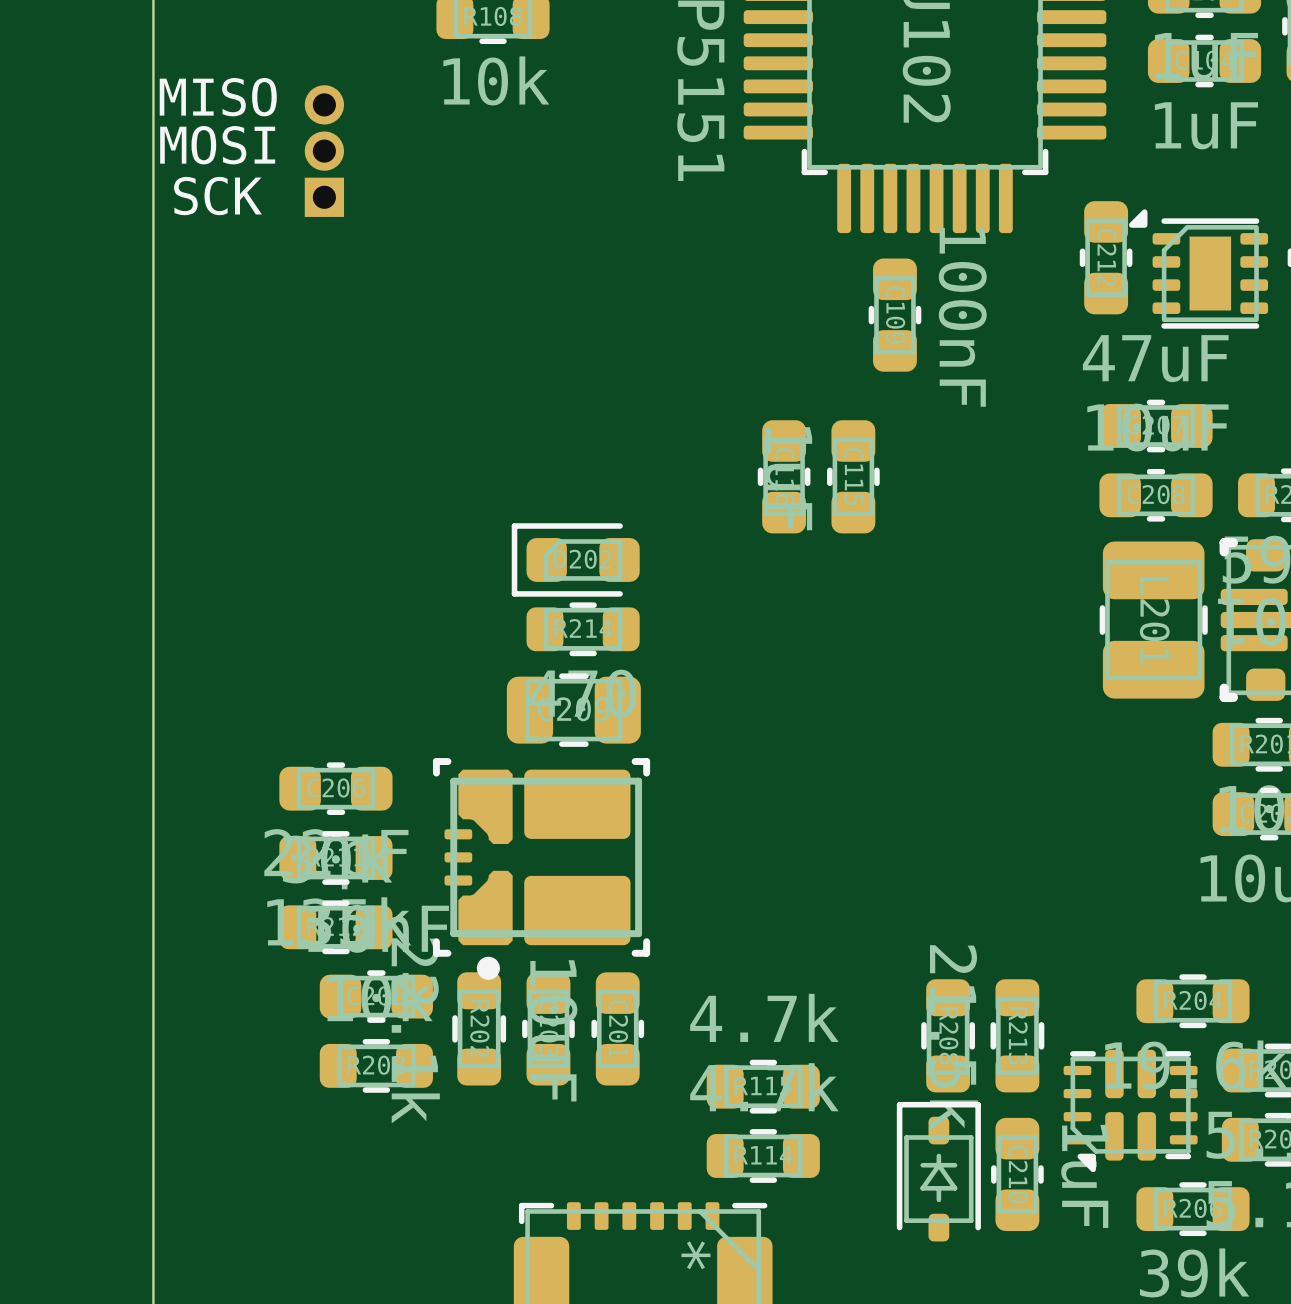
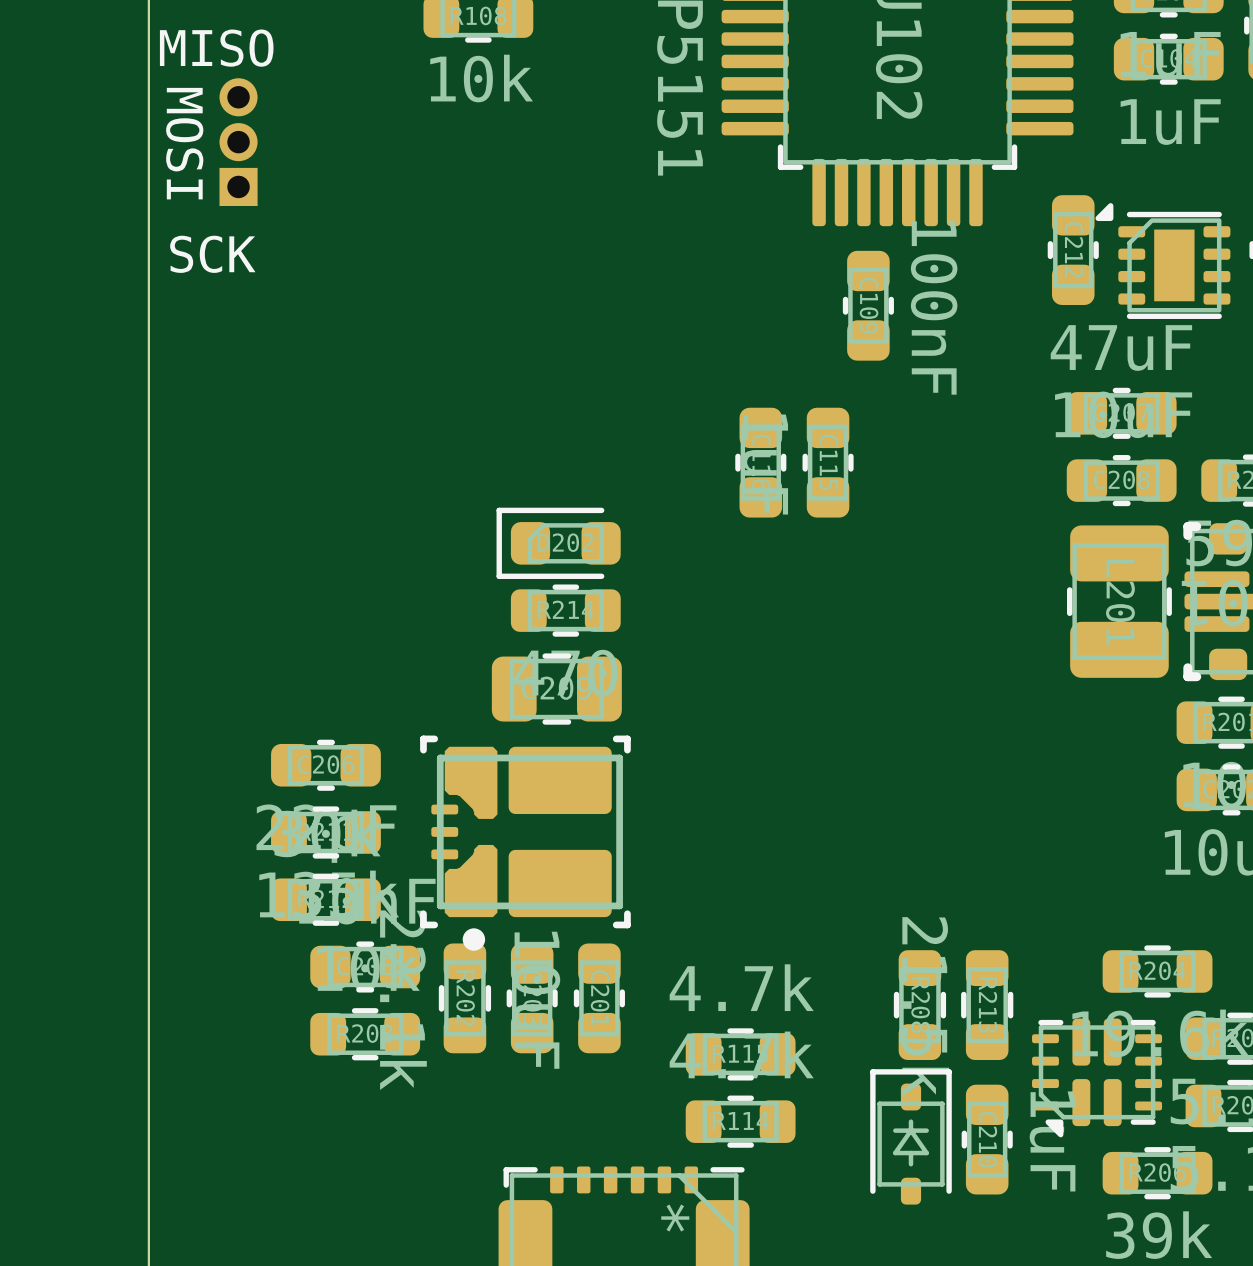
text position: MISO (218, 97) -> MISO (216, 48)
text rotation: 0° (217, 145) -> 90° clockwise (184, 143)
part position: (324, 151) -> (238, 142)
text position: SCK (217, 196) -> SCK (212, 254)

